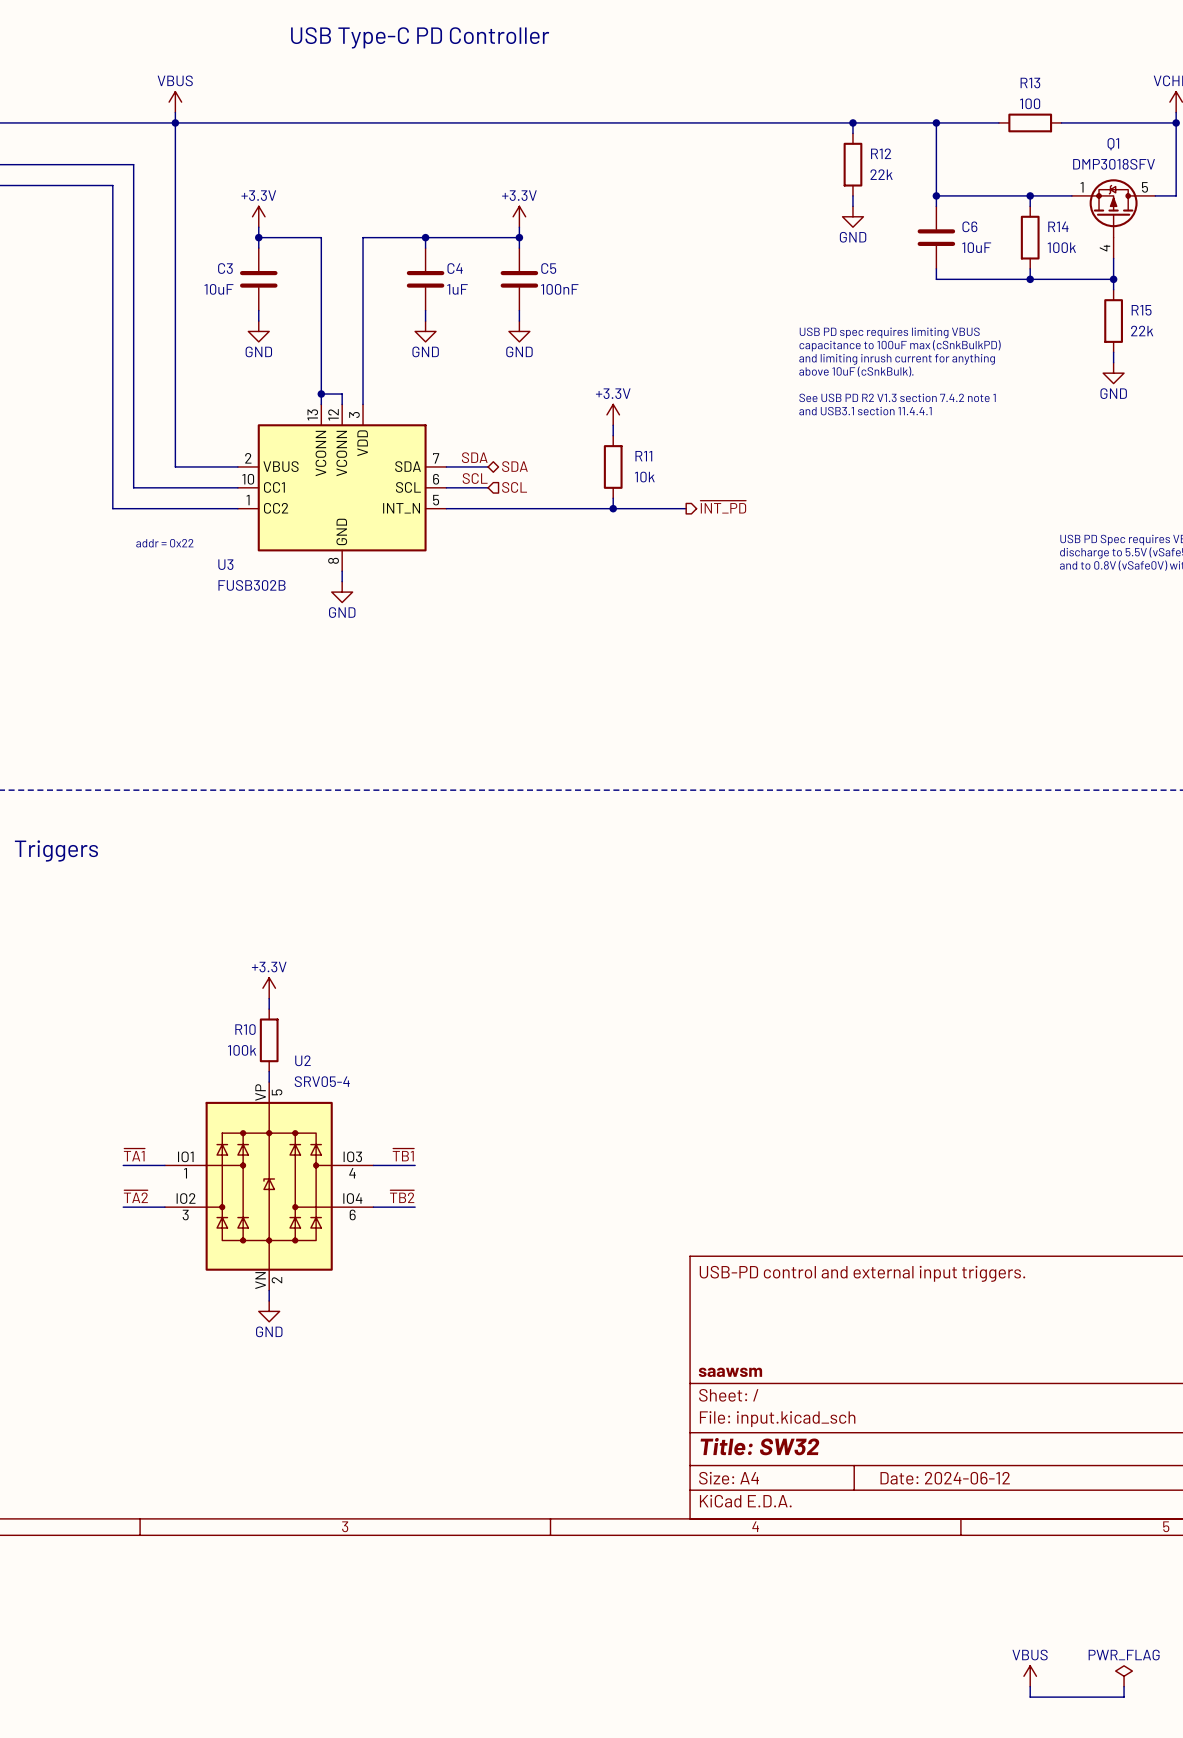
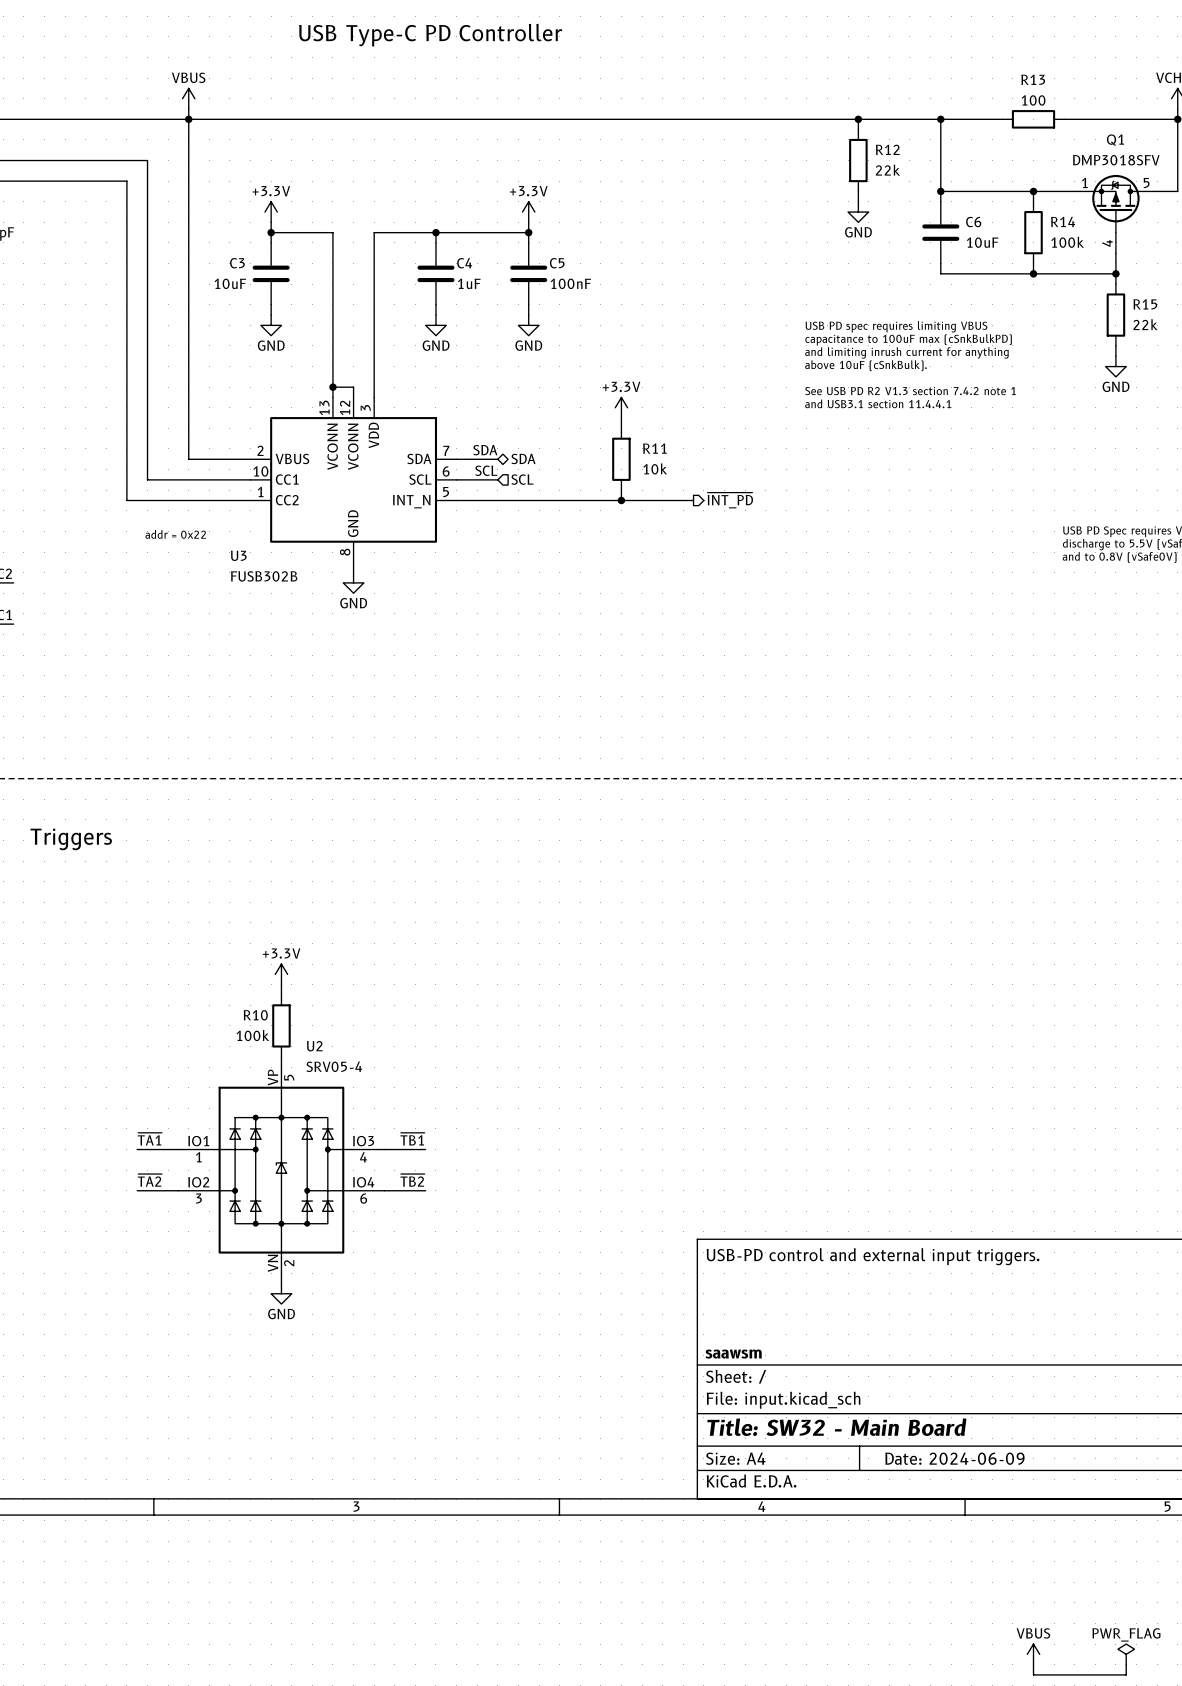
title block: Title: SW32 (759, 1446) -> Title: SW32 - Main Board (836, 1427)
title block: Date: 2024-06-12 (945, 1478) -> Date: 2024-06-09 (954, 1458)

